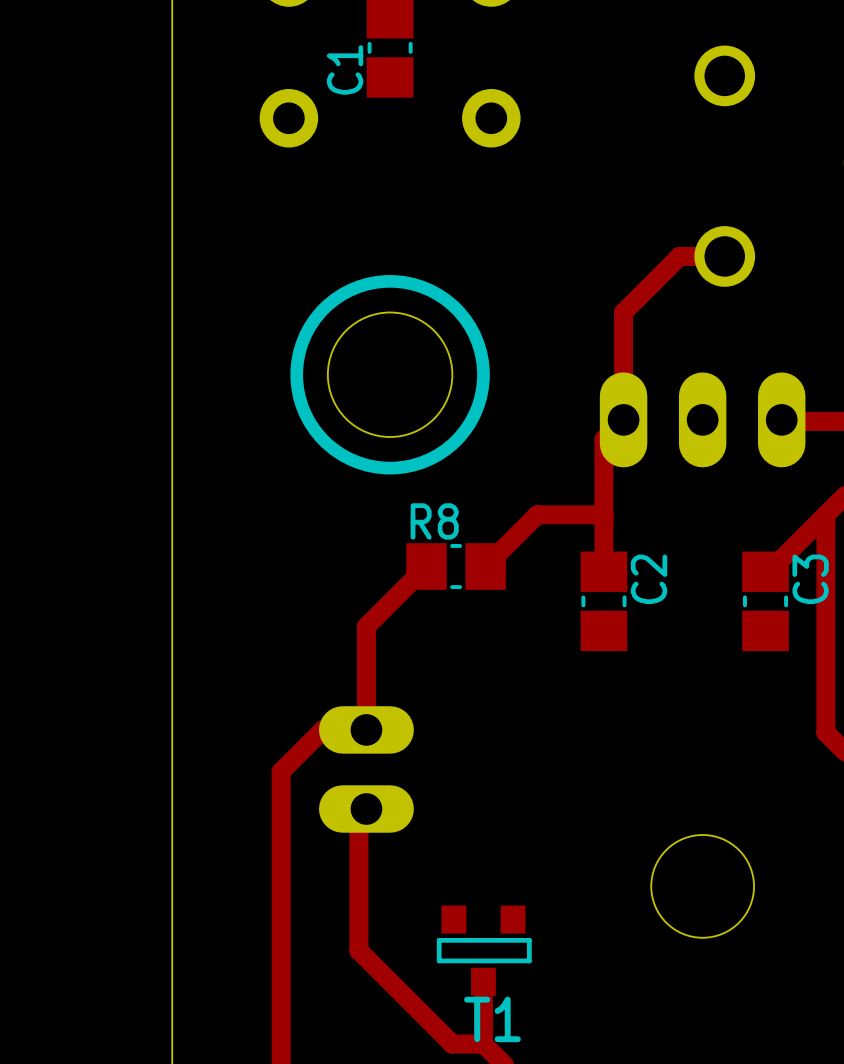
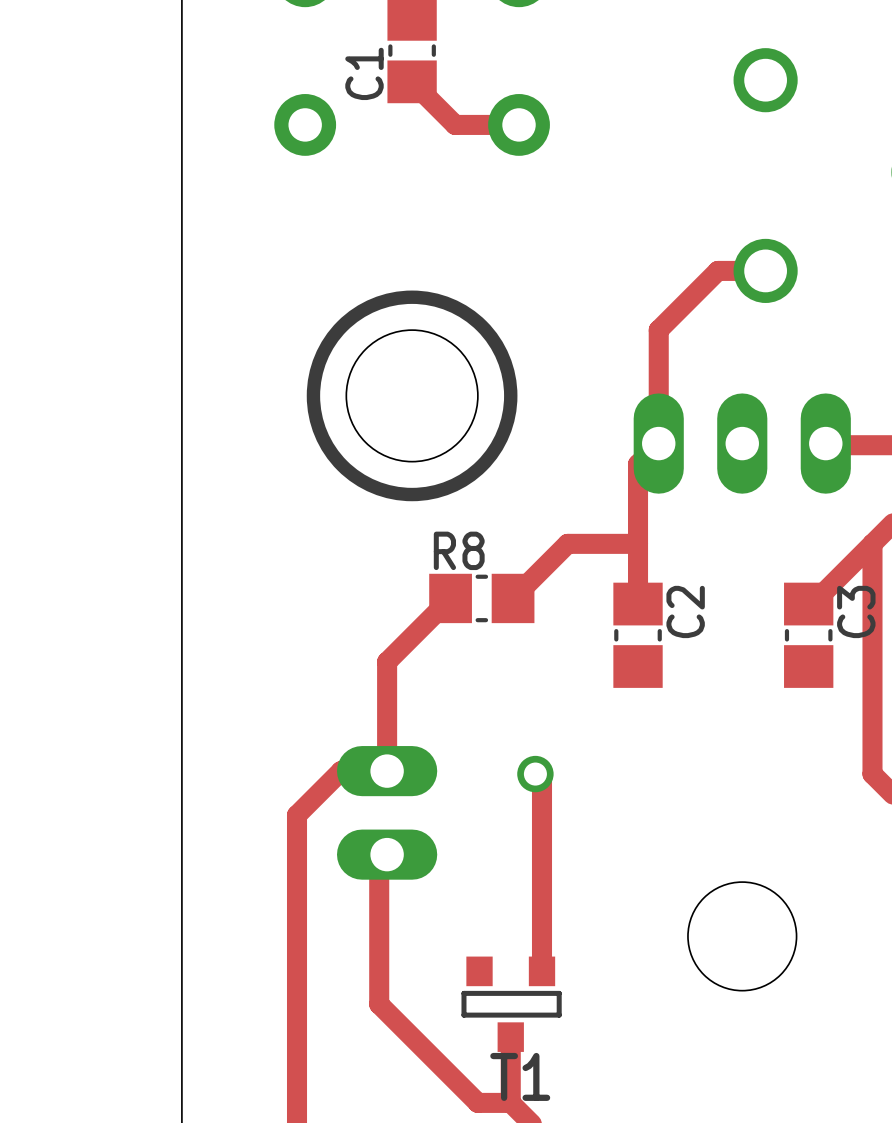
track: none -> (412, 81) (455, 124) (519, 124)
track: none -> (535, 774) (542, 780) (542, 971)
via: none -> (535, 774)

